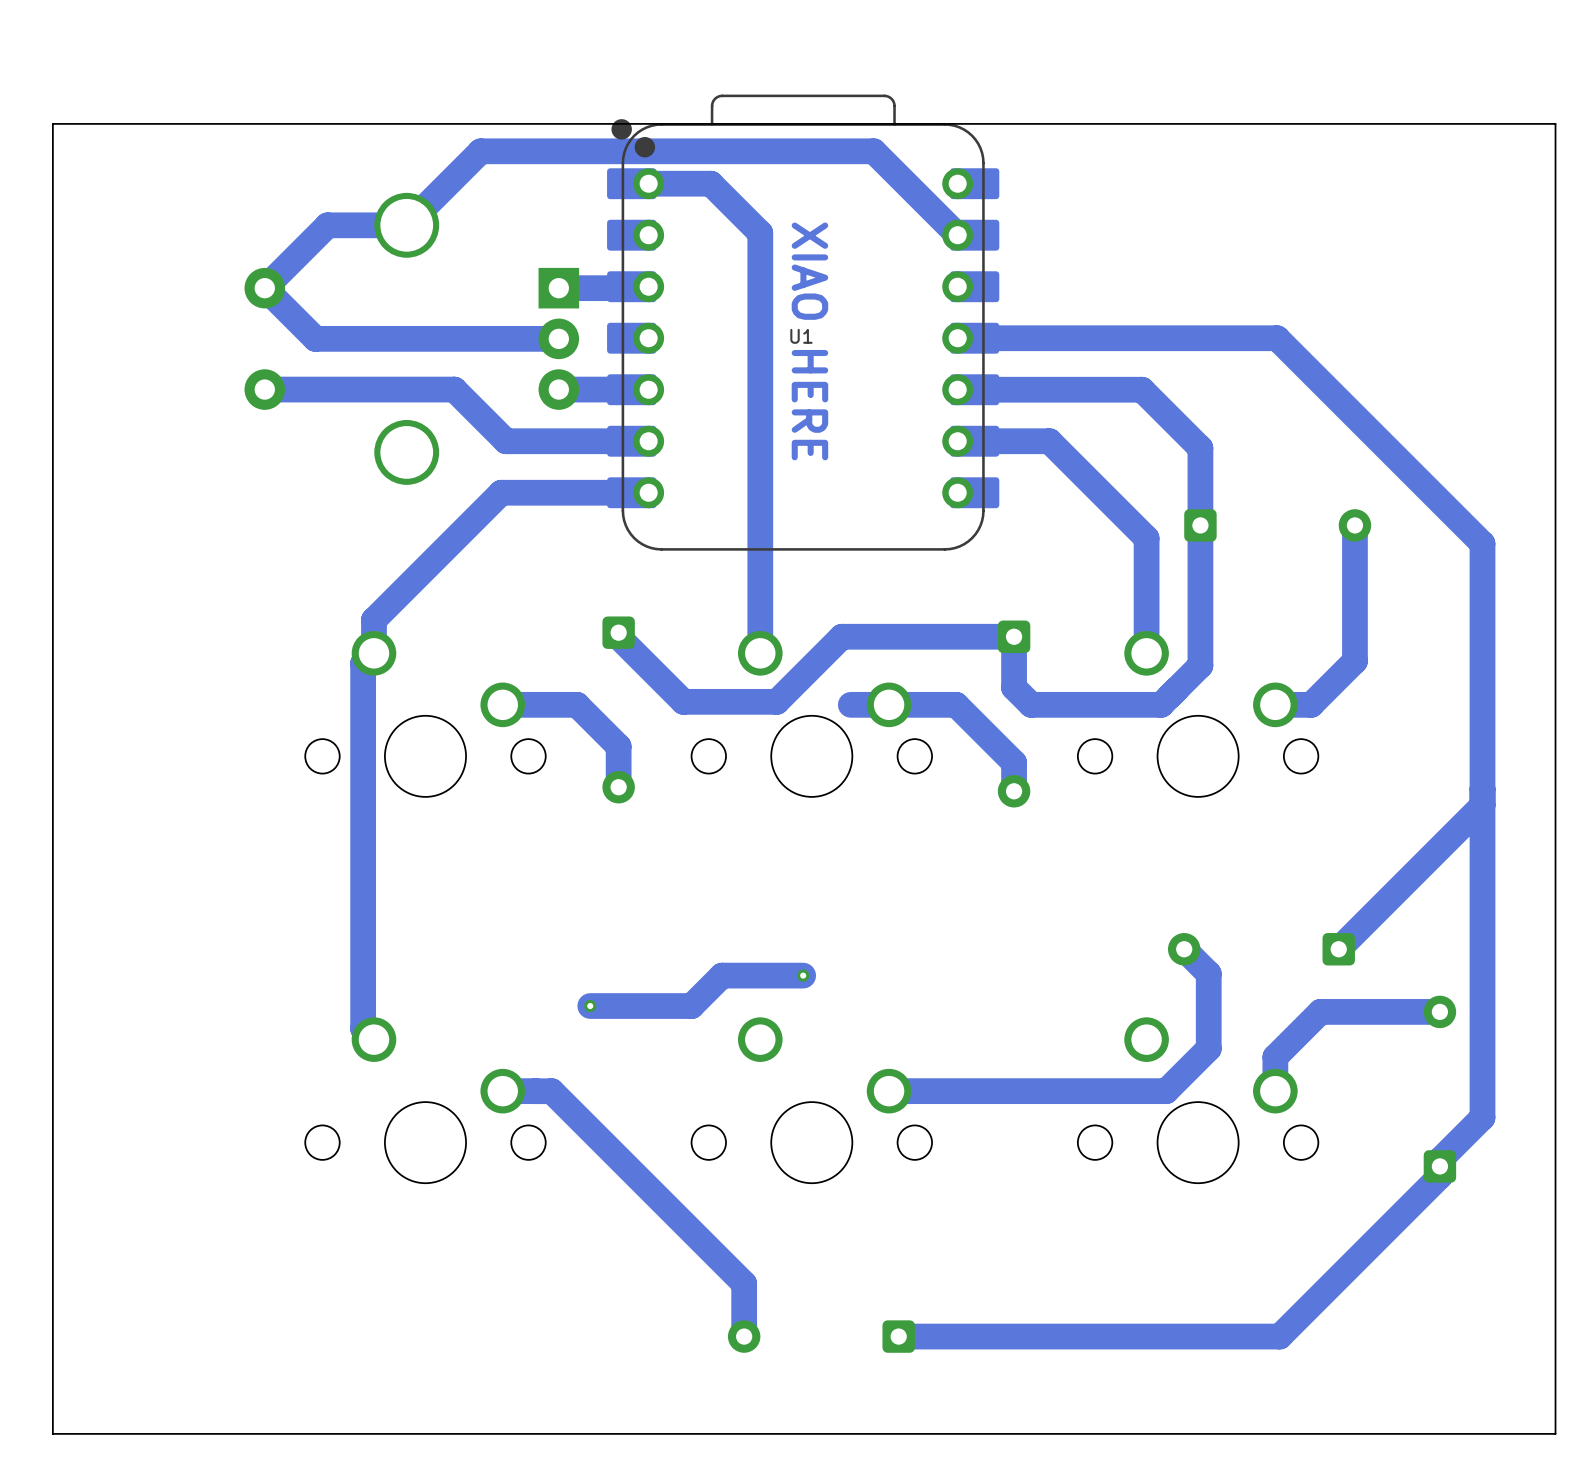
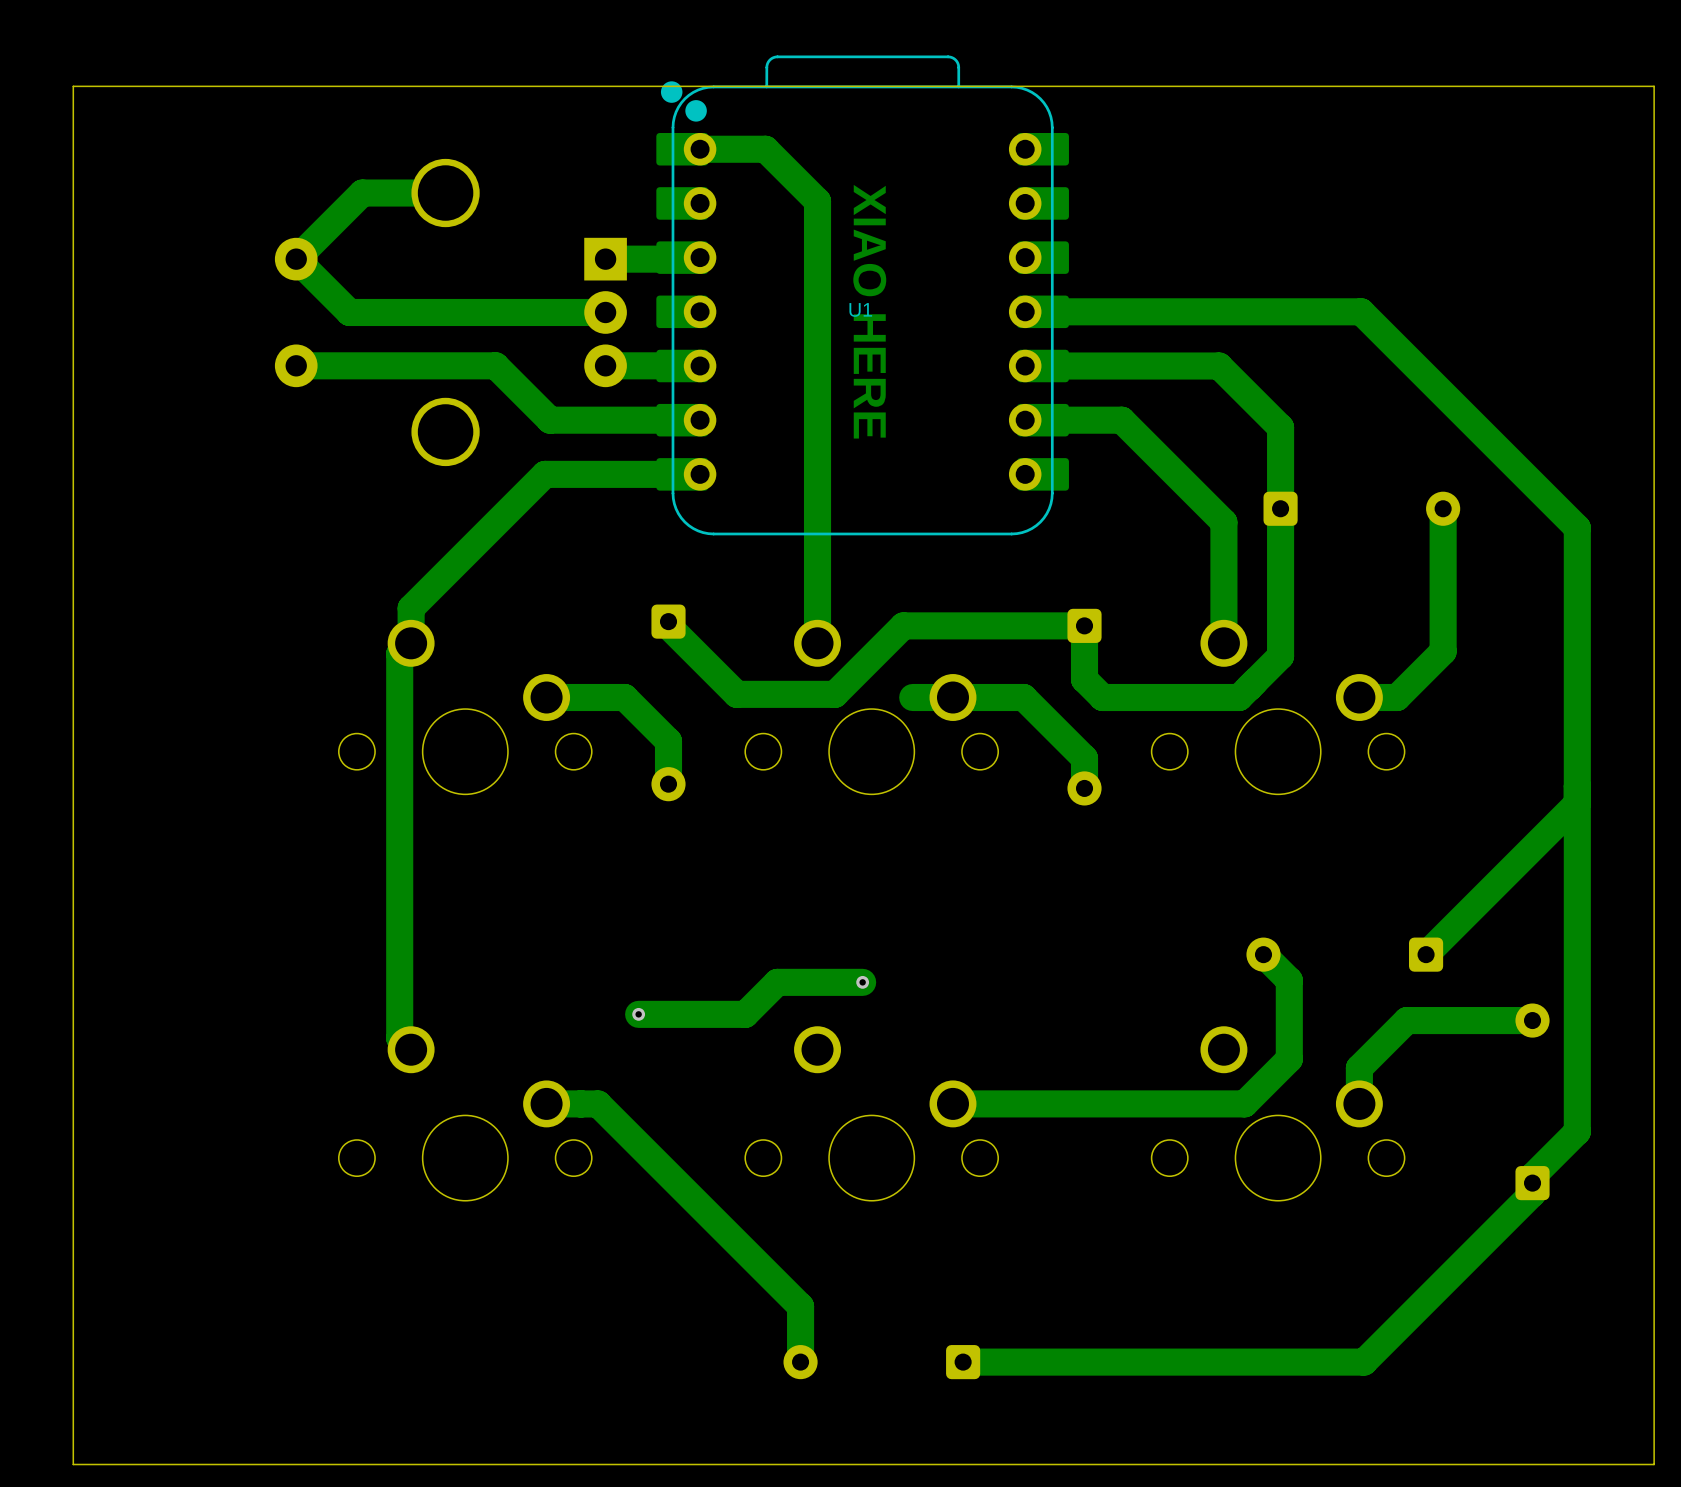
track: (406, 225) (480, 151) (873, 151) (957, 235) -> none

